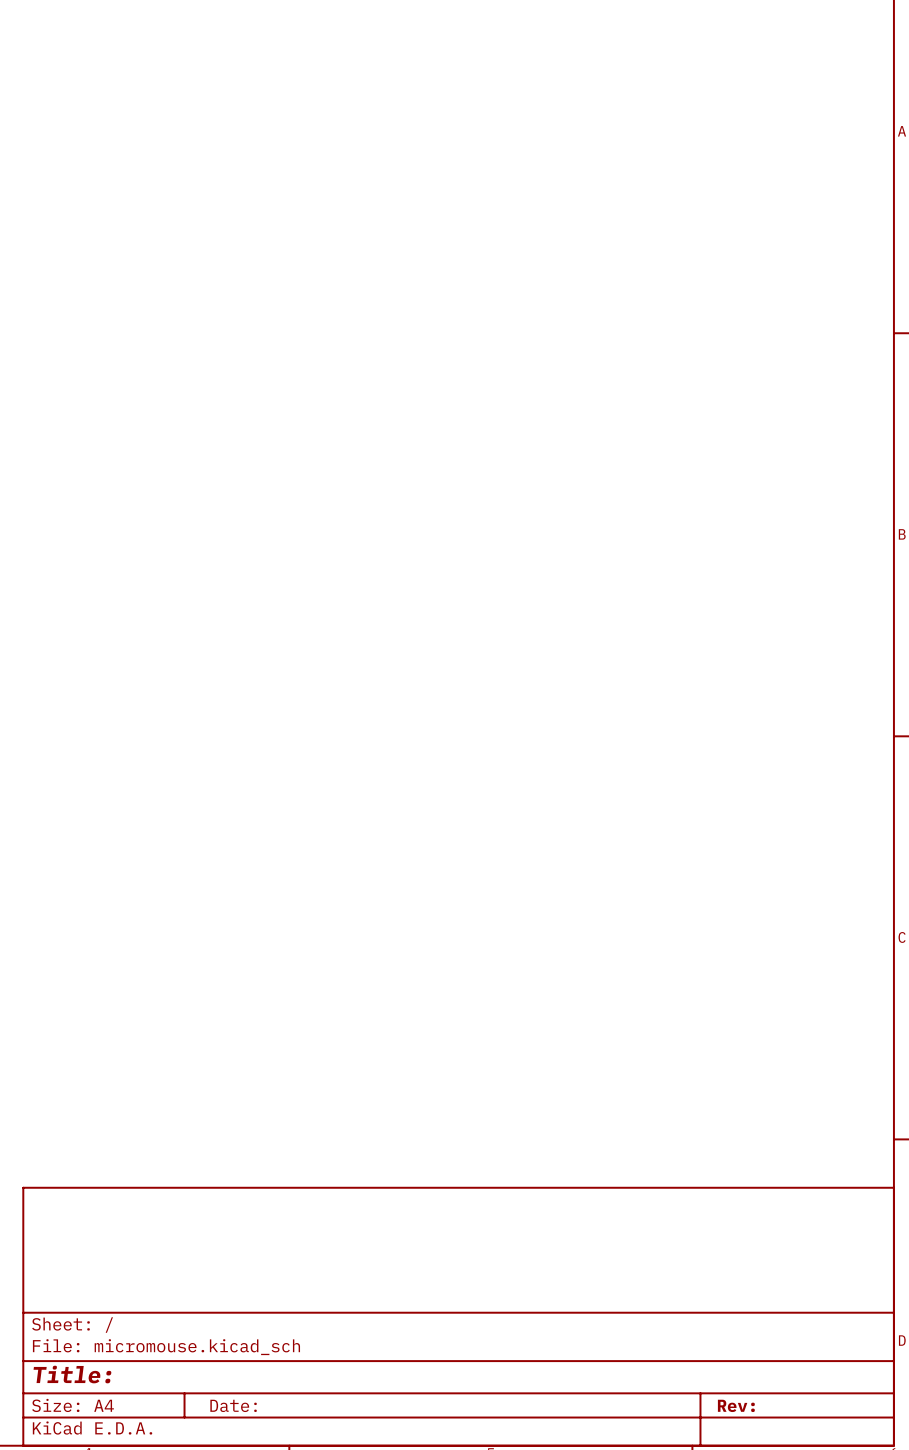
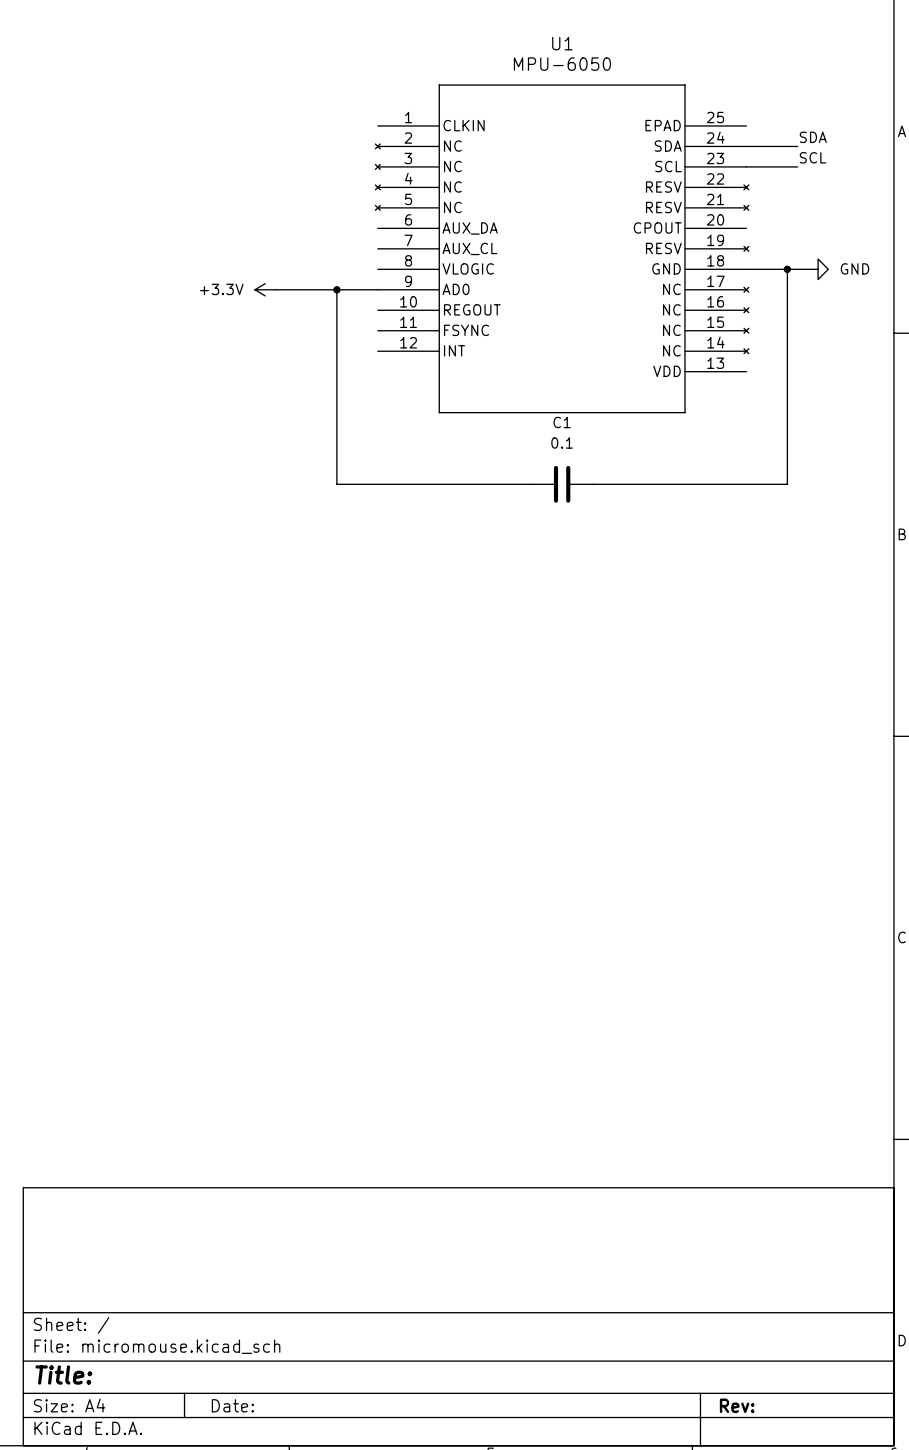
label: none -> SDA (813, 137)
wire: none -> (746, 146) (797, 146)
label: none -> SCL (813, 157)
wire: none -> (746, 166) (797, 166)
U1: none -> MPU-6050 (562, 248)
wire: none -> (746, 269) (807, 269)
wire: none -> (787, 269) (787, 484) (592, 484)
junction: none -> (787, 269)
power symbol: none -> GND (818, 269)
power symbol: none -> +3.3V (265, 289)
wire: none -> (275, 289) (377, 289)
wire: none -> (336, 289) (336, 484) (531, 484)
junction: none -> (336, 289)
C1: none -> 0.1 (562, 484)

